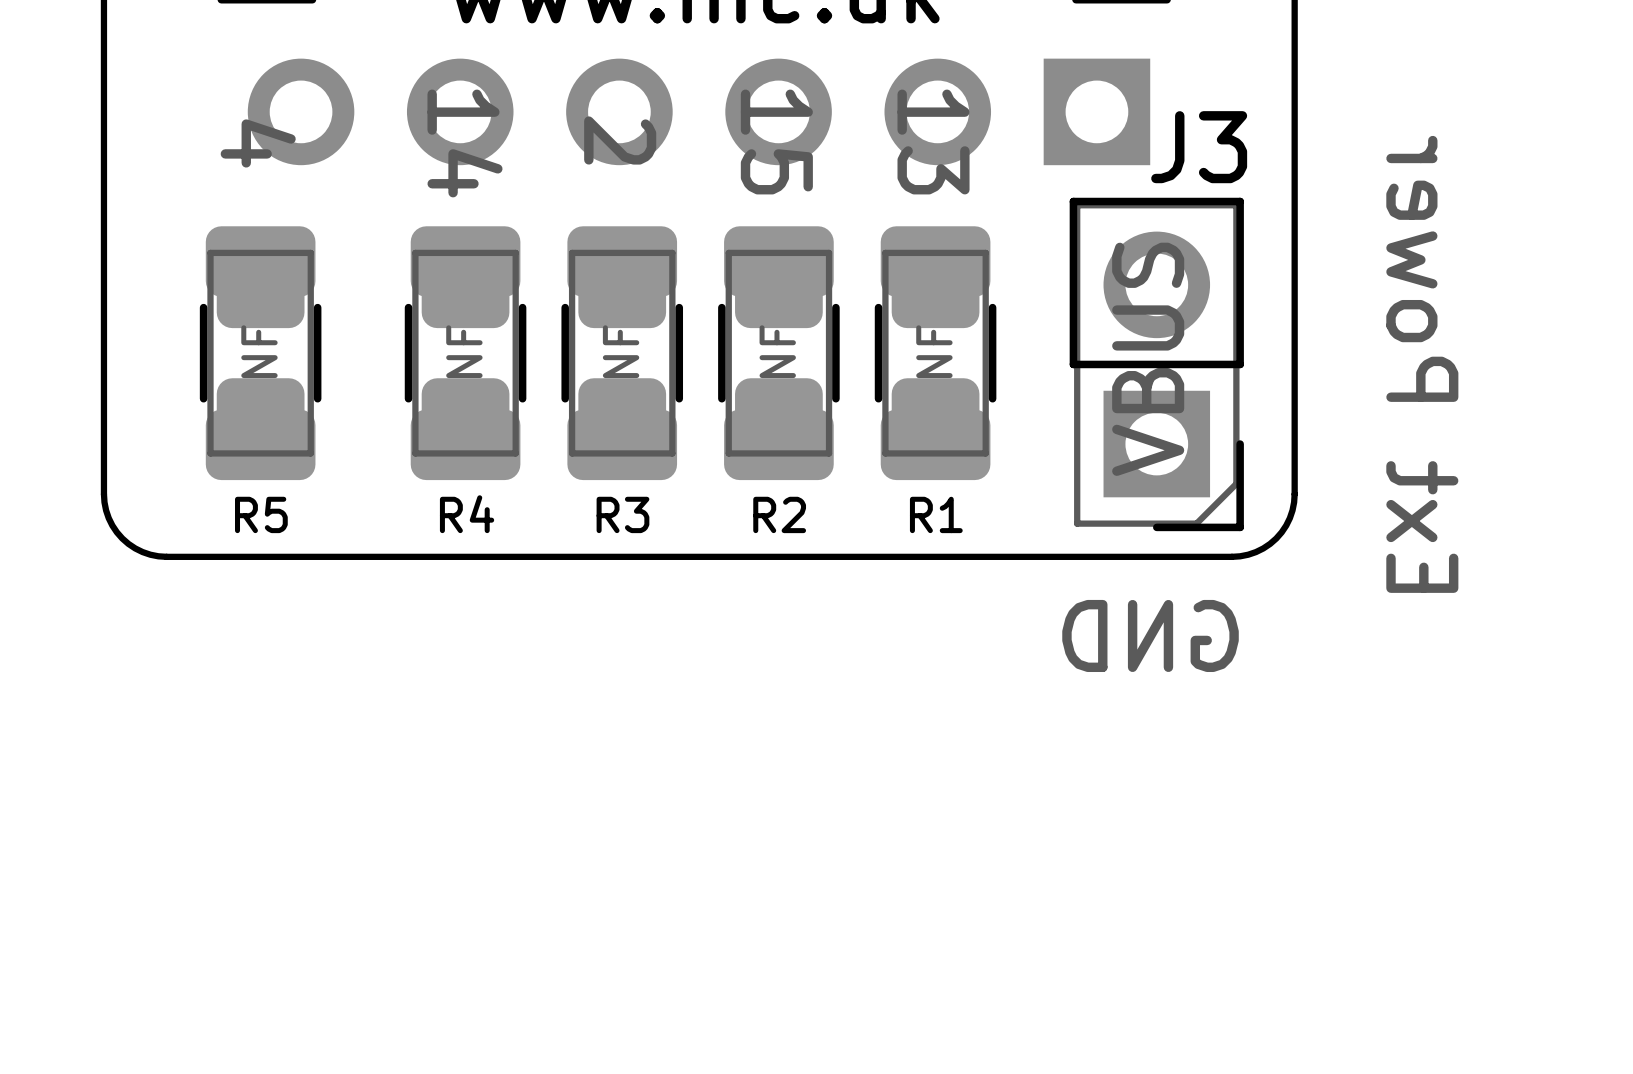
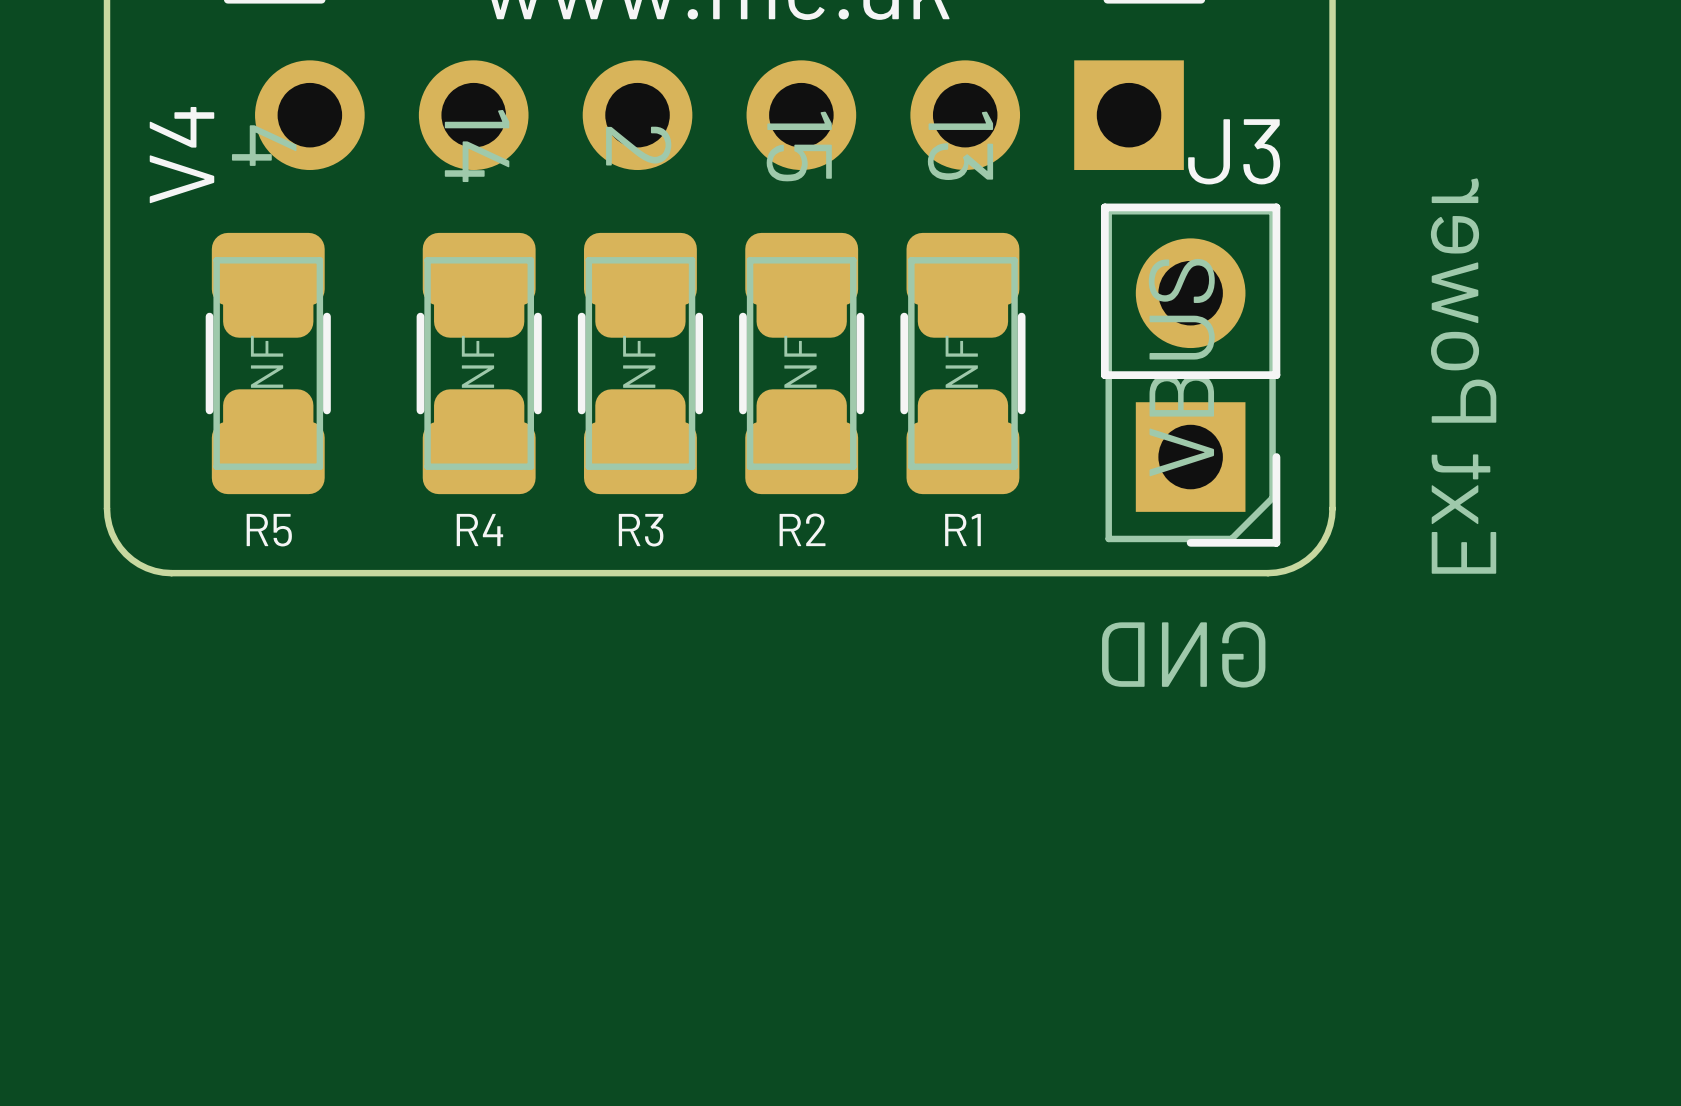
text: none -> V4 (181, 155)

